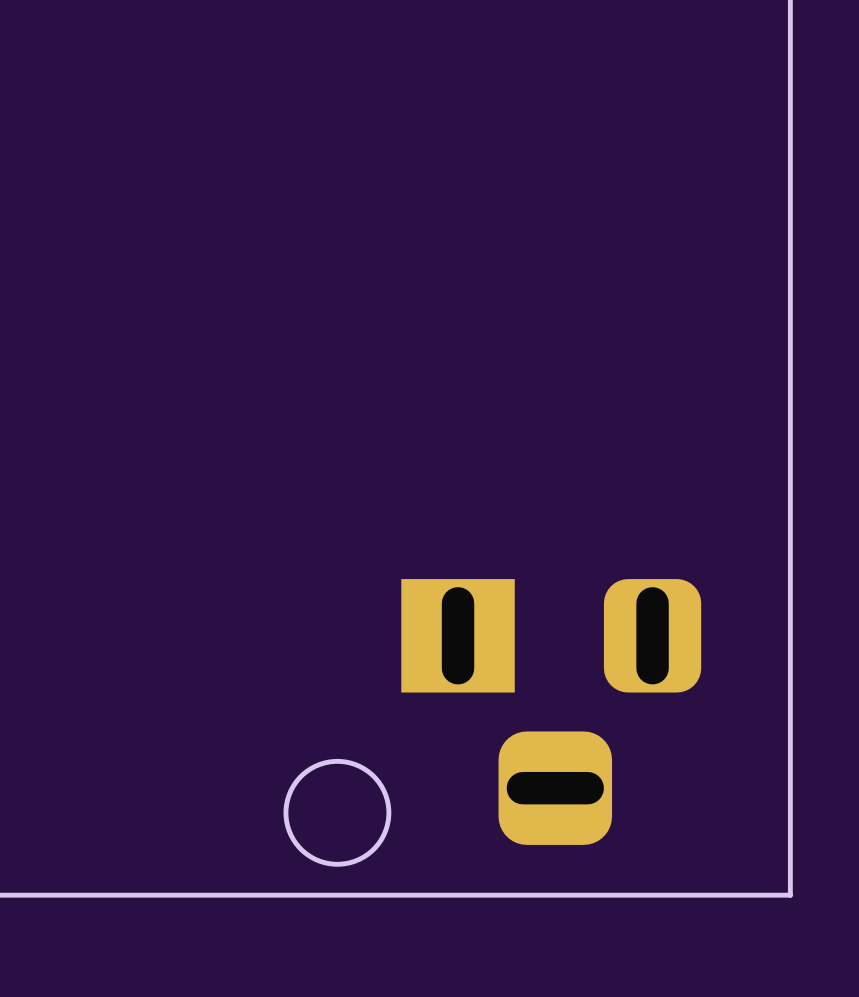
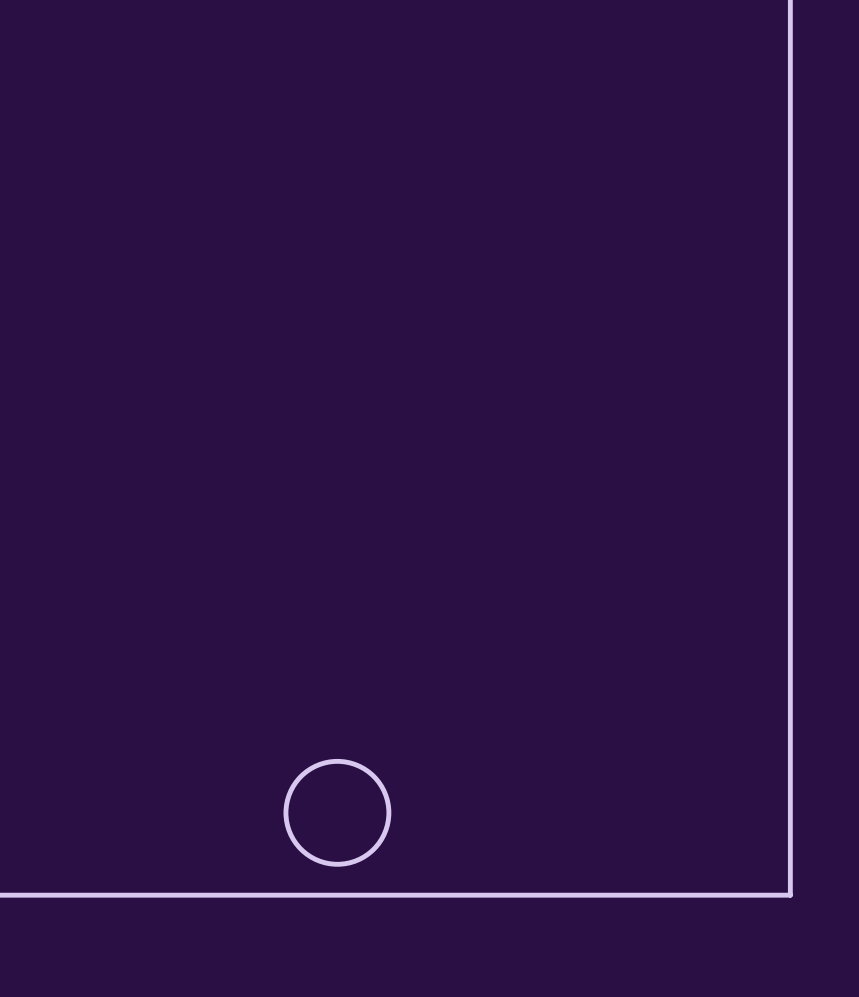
part: (551, 711) -> none

